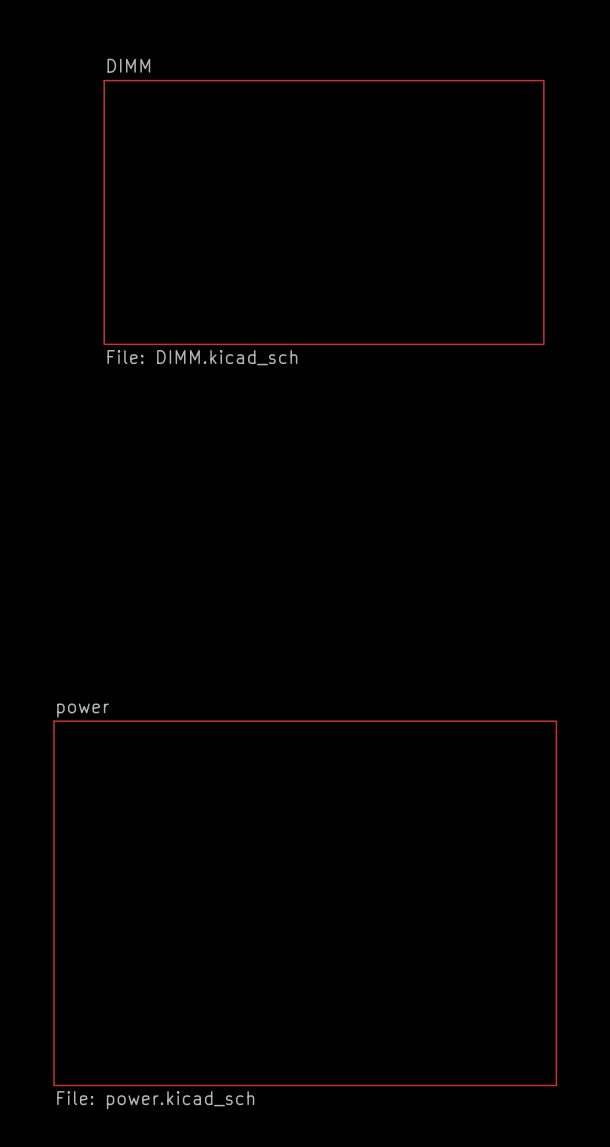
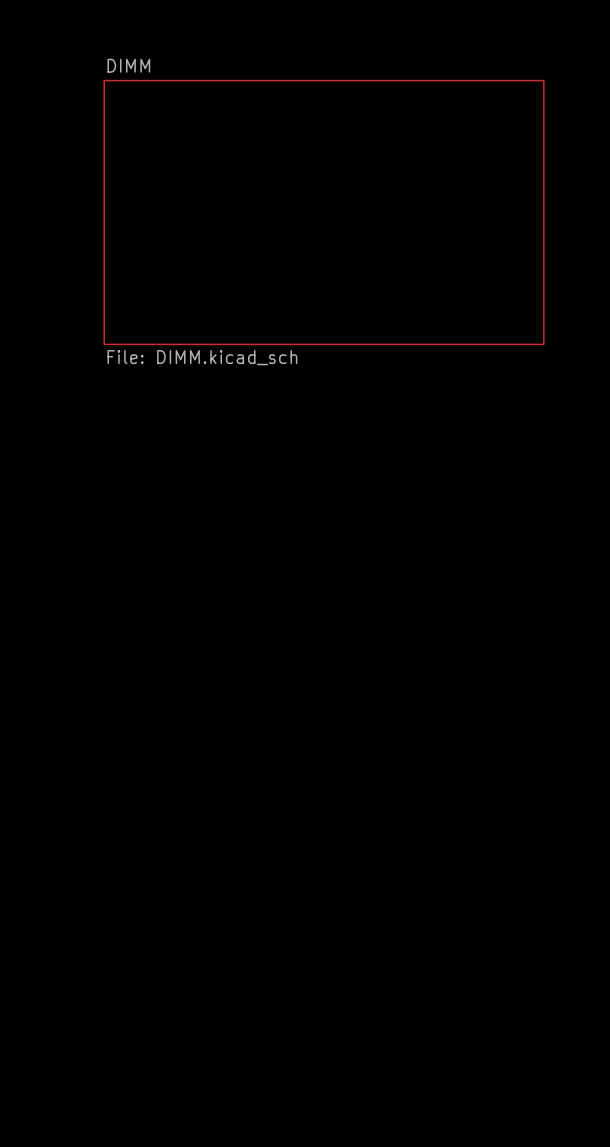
sheet power: File: power.kicad_sch (305, 903) -> none

